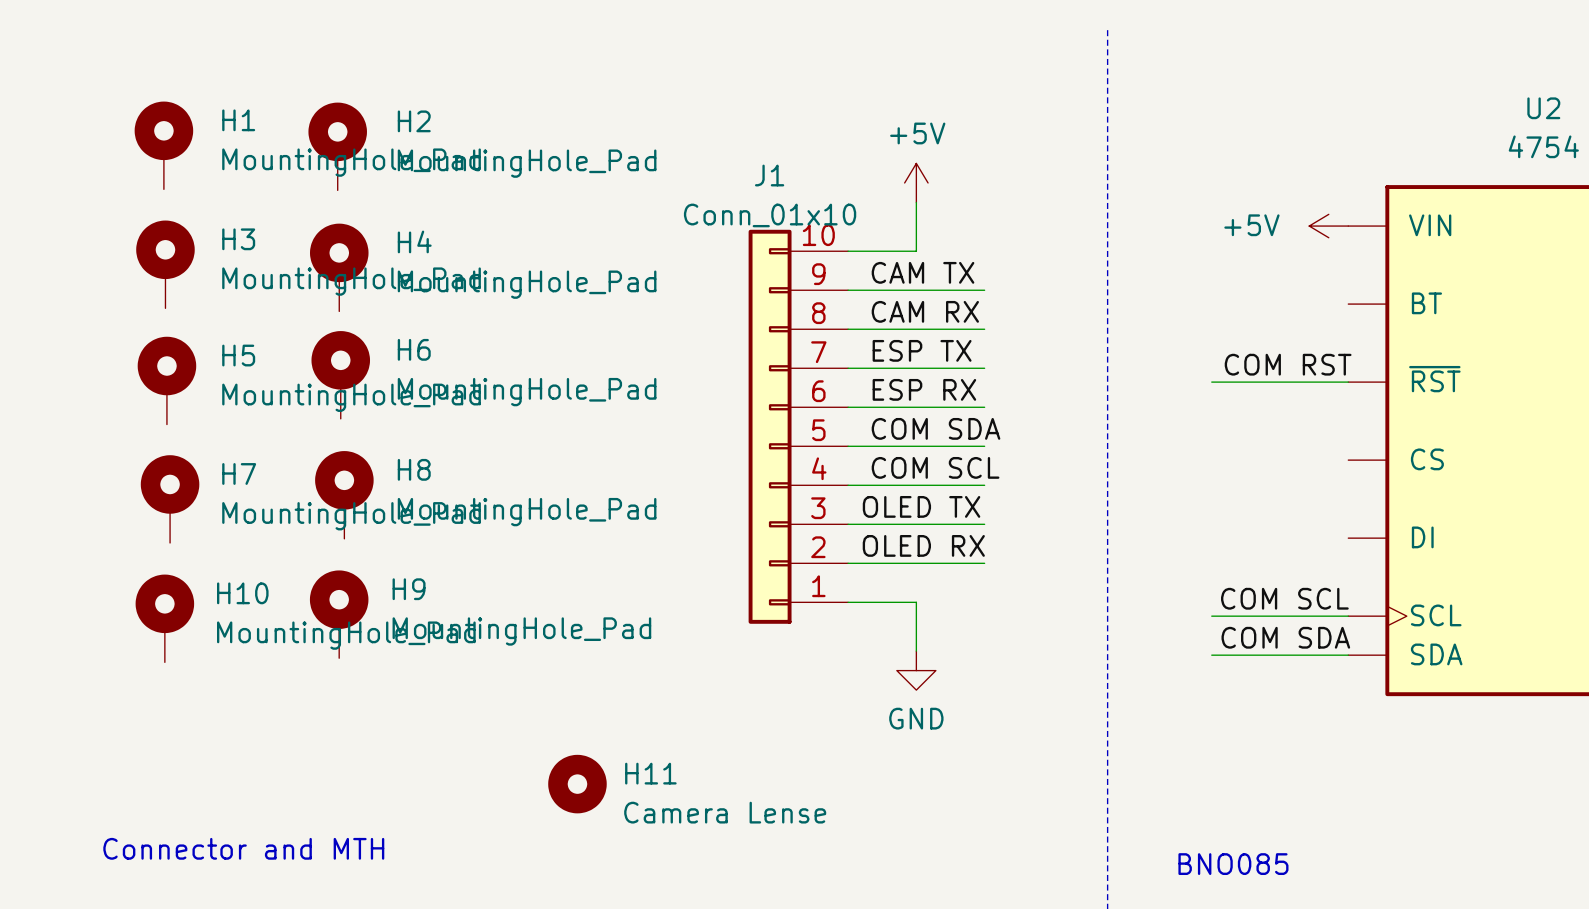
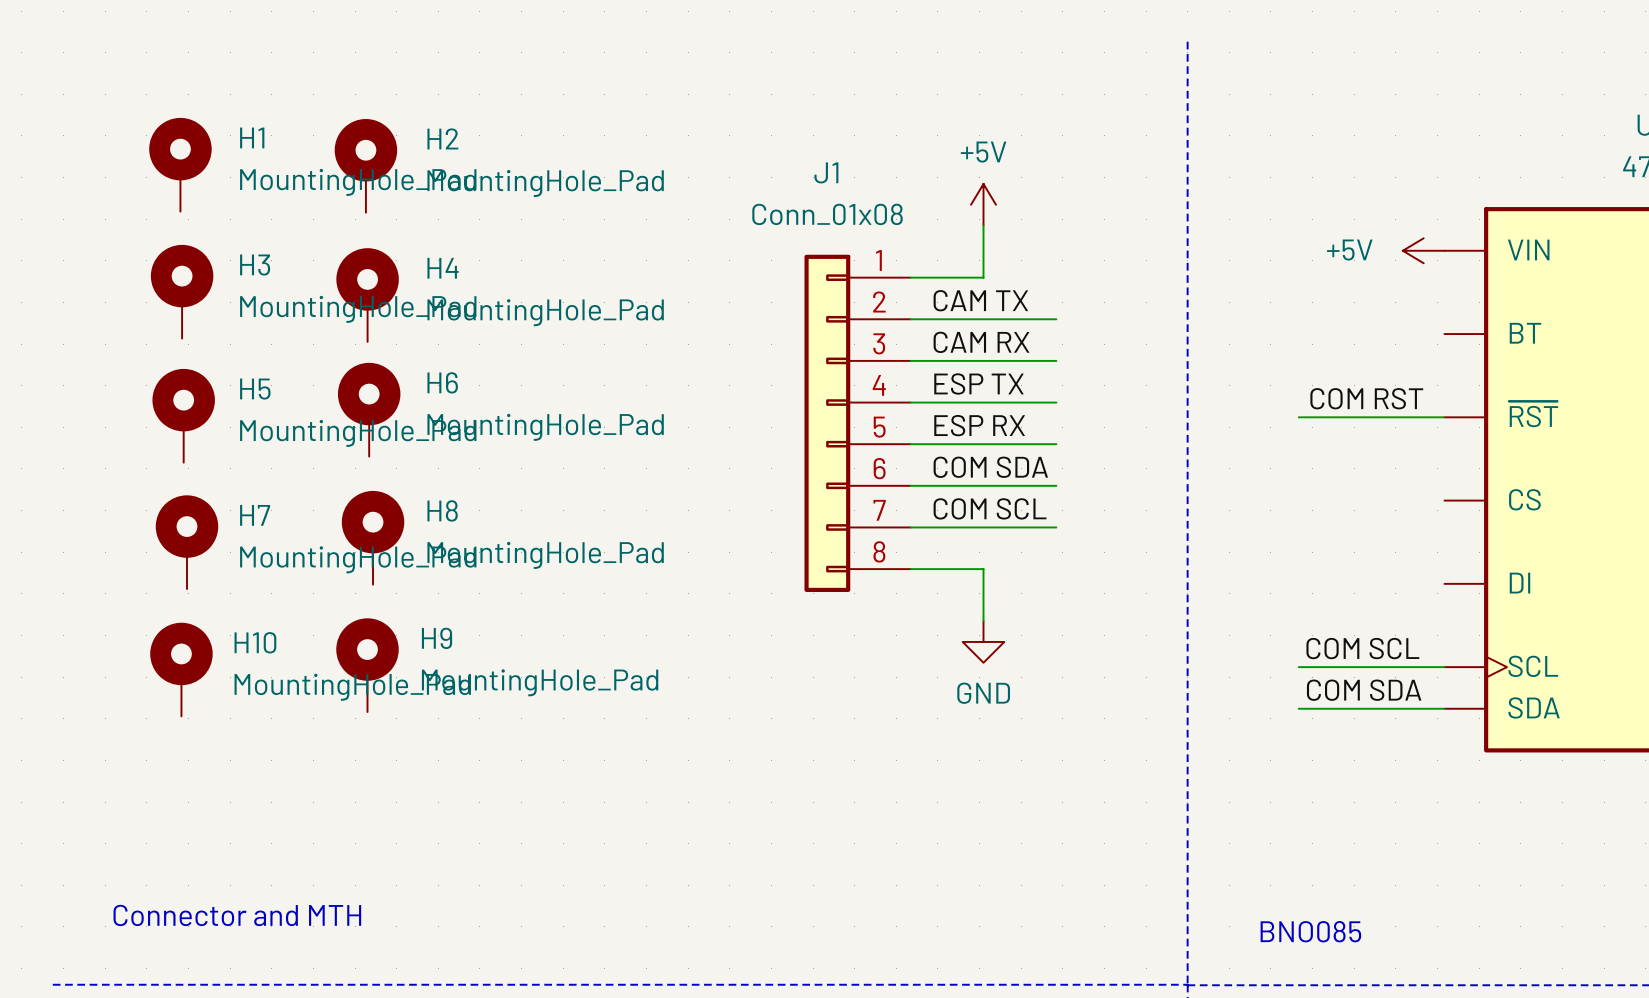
J1 value: Conn_01x10 (770, 215) -> Conn_01x08 (827, 214)
J1 symbol: [748, 229, 849, 624] -> [804, 254, 911, 592]
label: OLED TX (921, 506) -> none
wire: (916, 524) (984, 524) -> (983, 569) (983, 621)
label: OLED RX (923, 545) -> none
wire: (848, 563) (984, 563) -> none
wire: (848, 602) (916, 602) (916, 651) -> none
power symbol position: GND (916, 670) -> GND (983, 641)
H11: Camera Lense (577, 784) -> none

